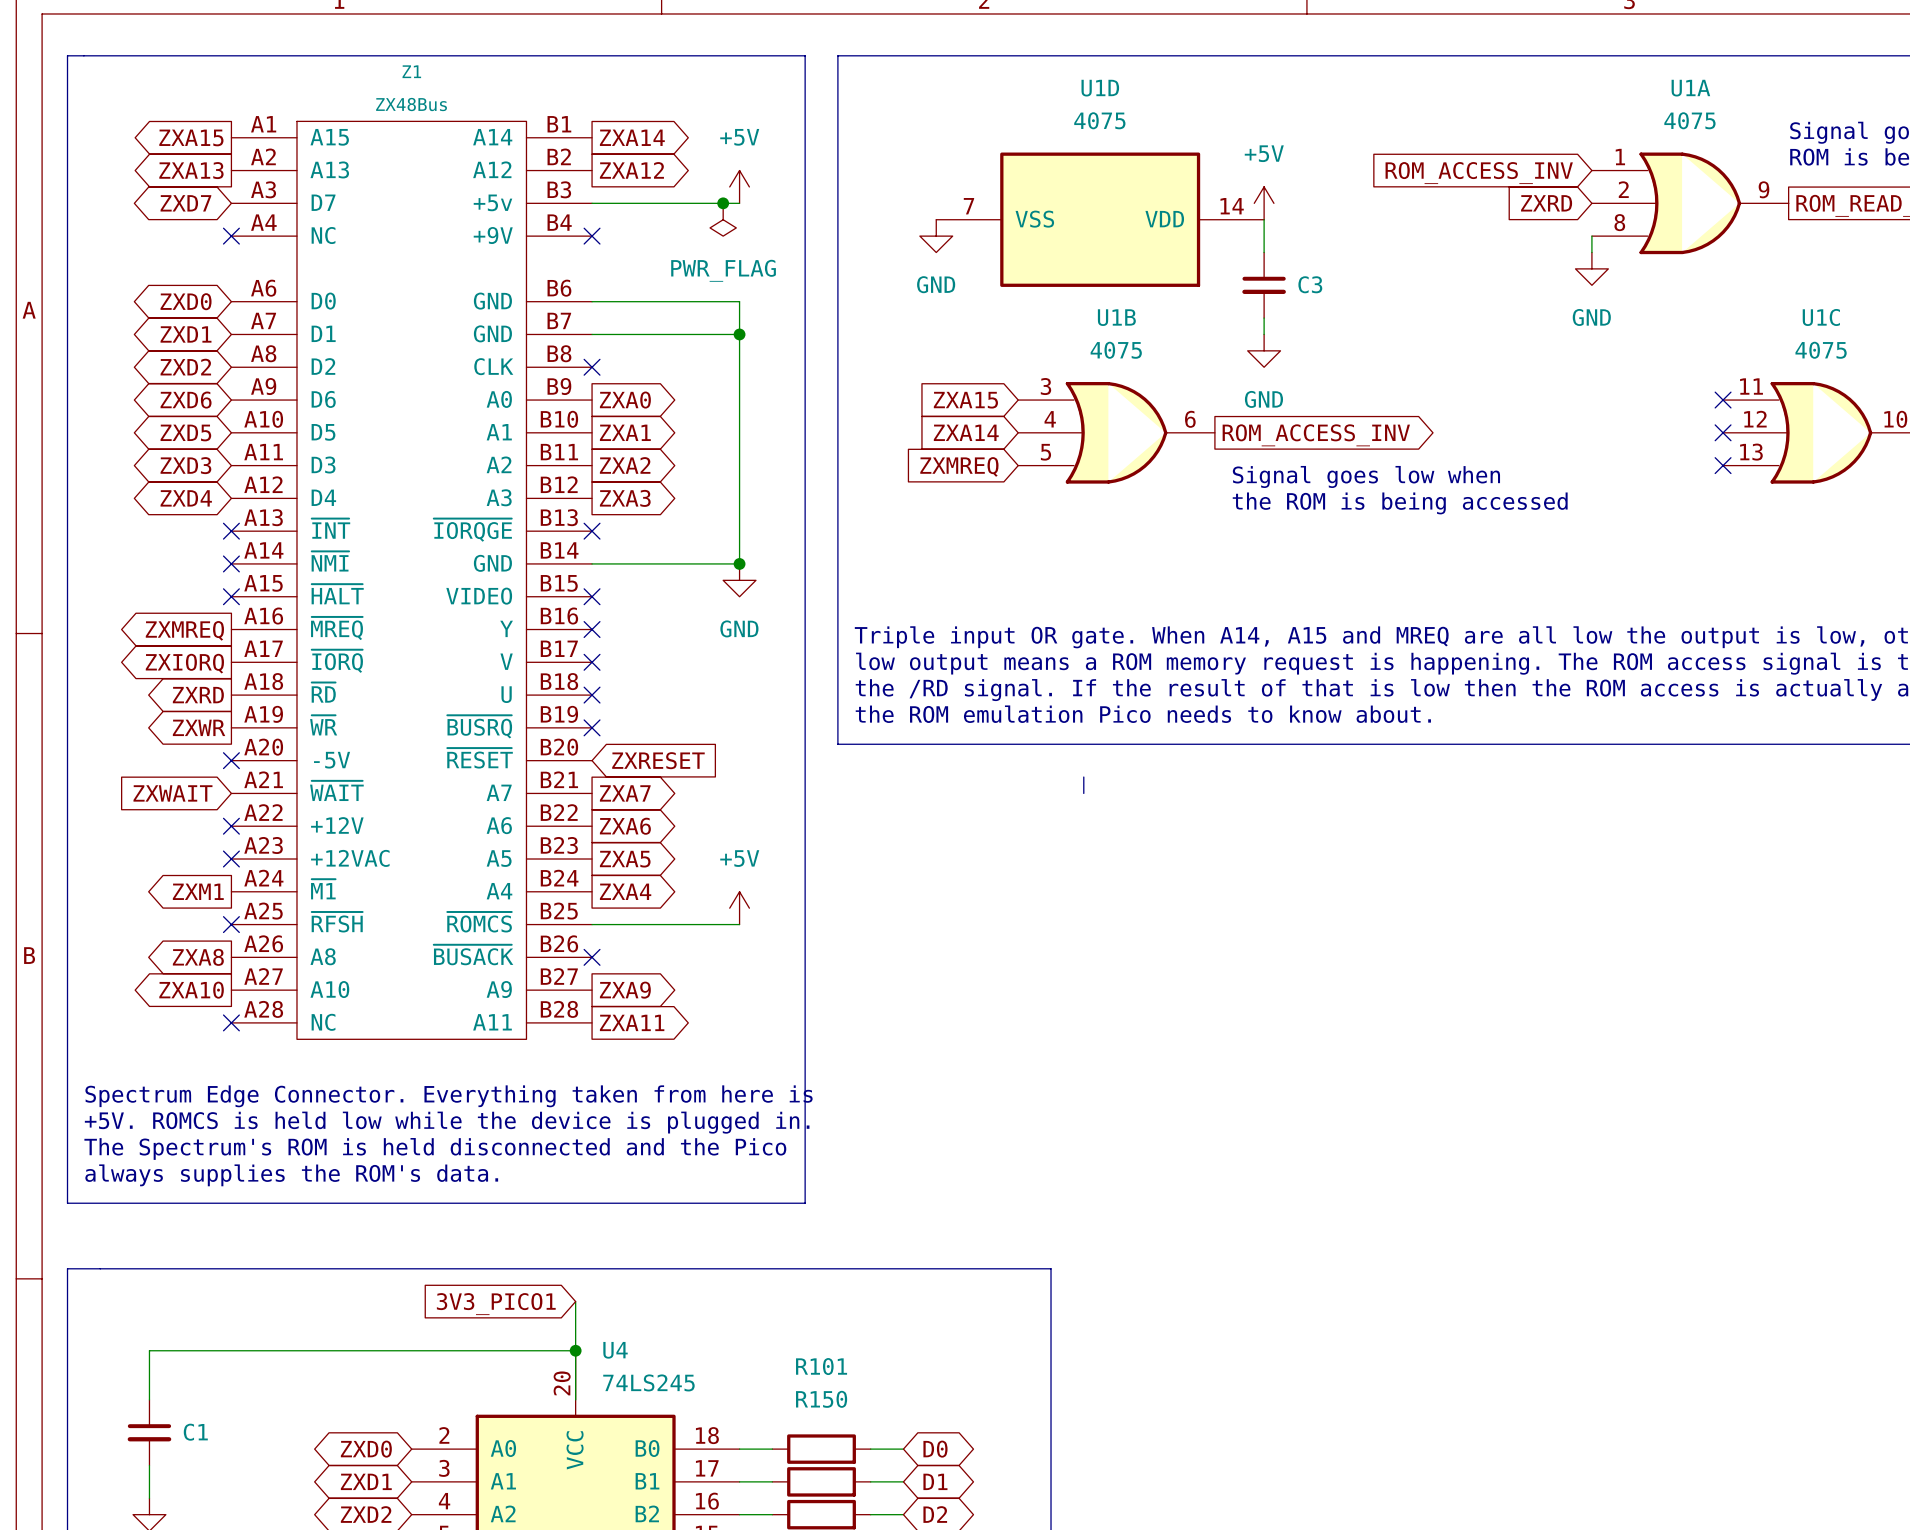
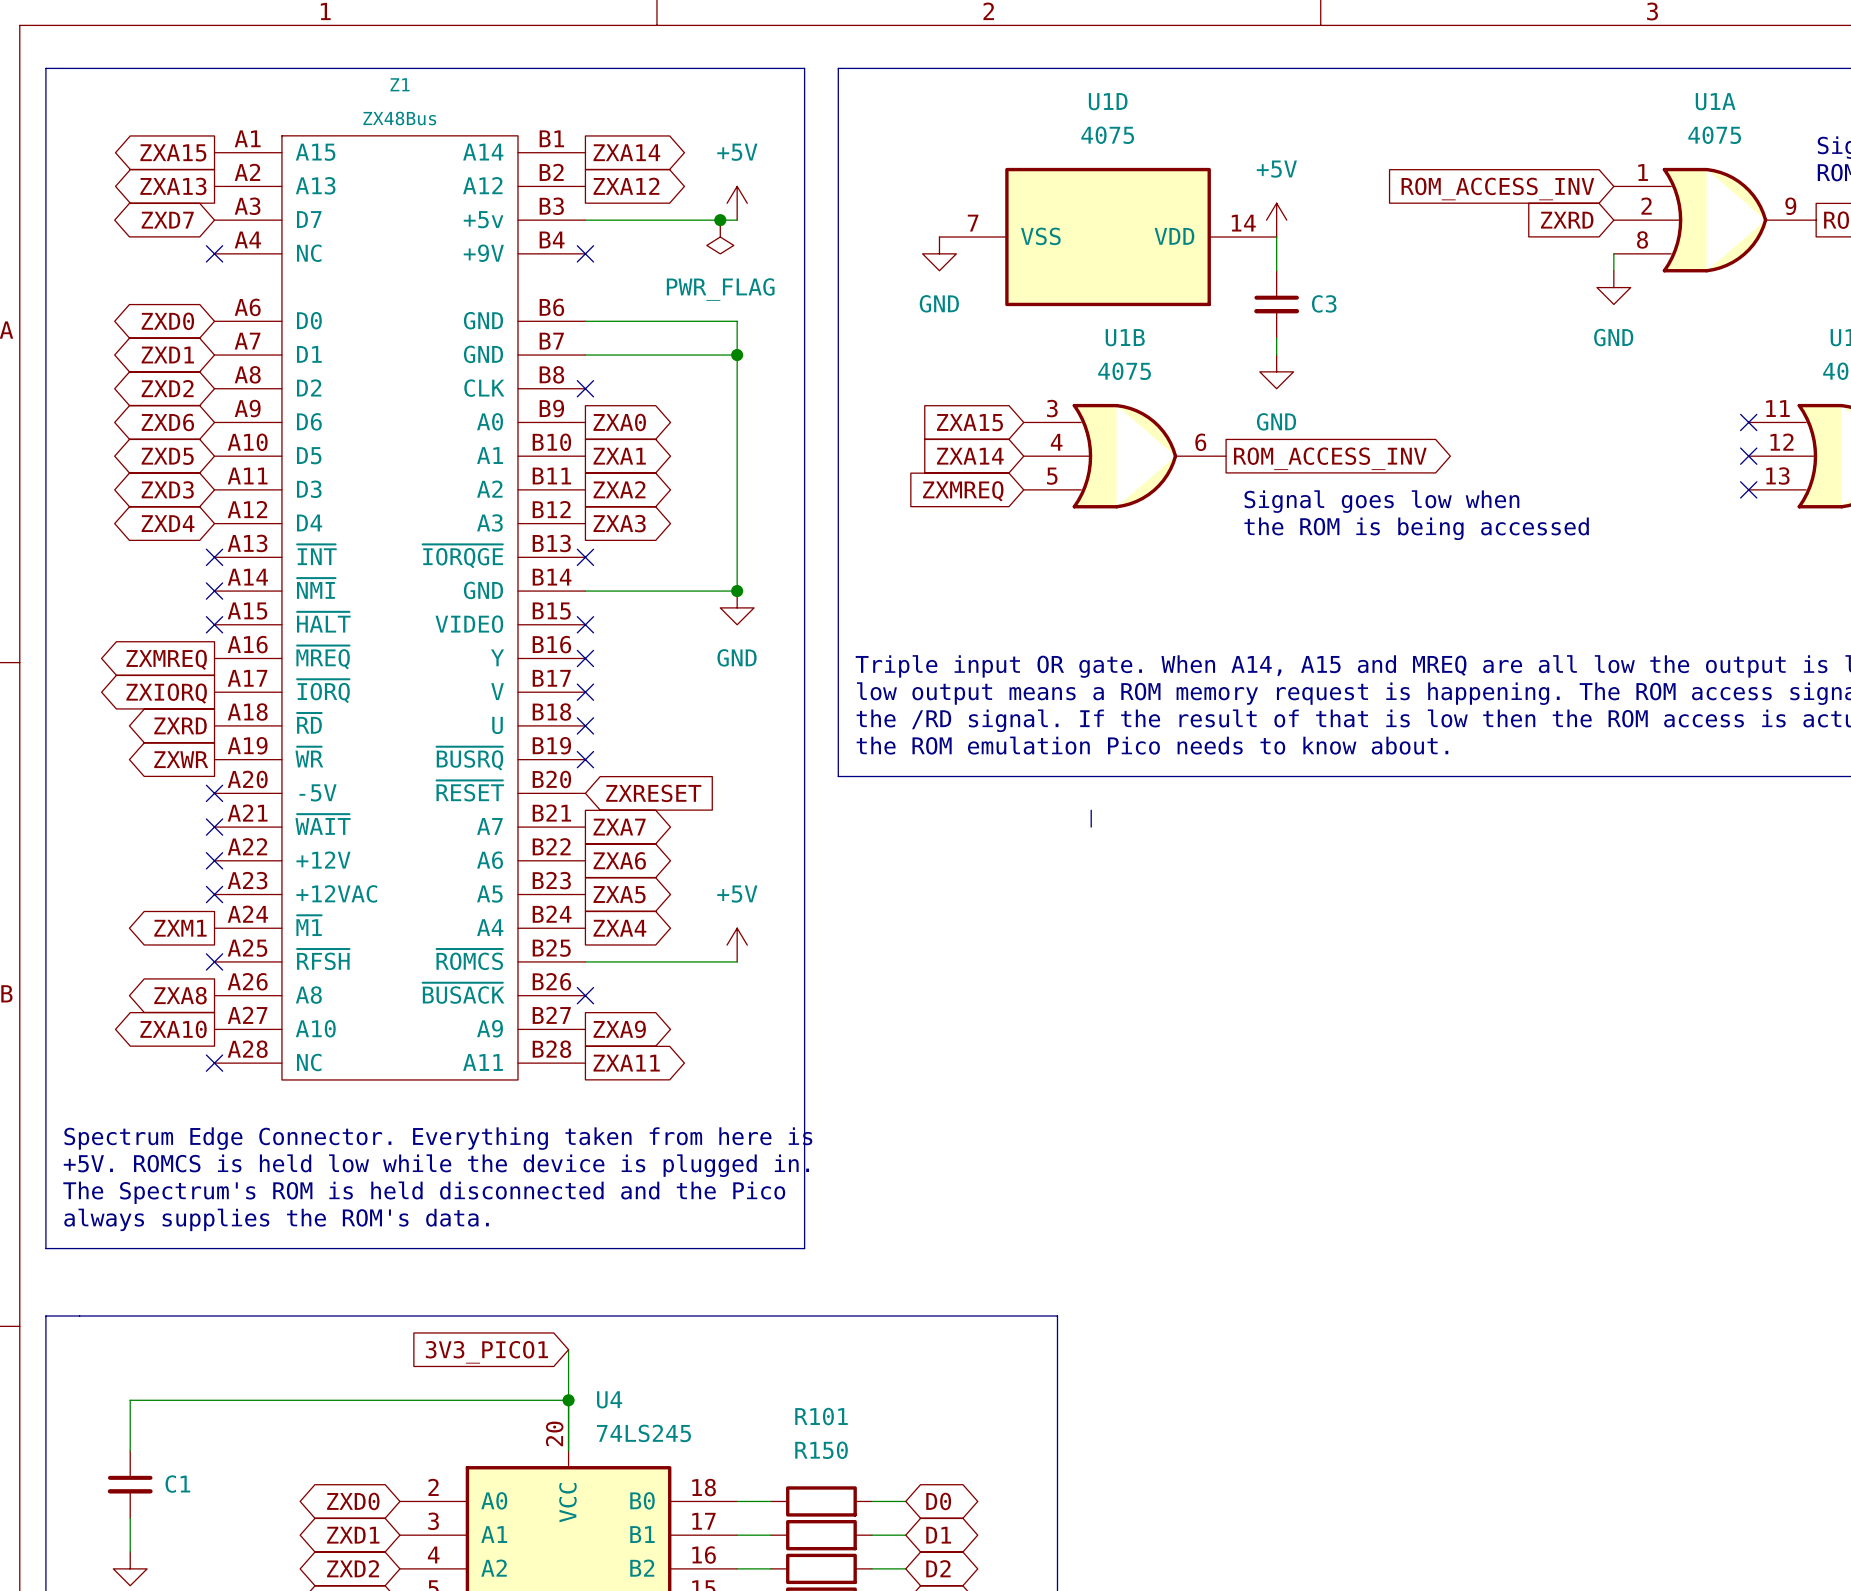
global label: ZXWAIT (172, 793) -> none
no-connect mark: none -> (214, 827)

